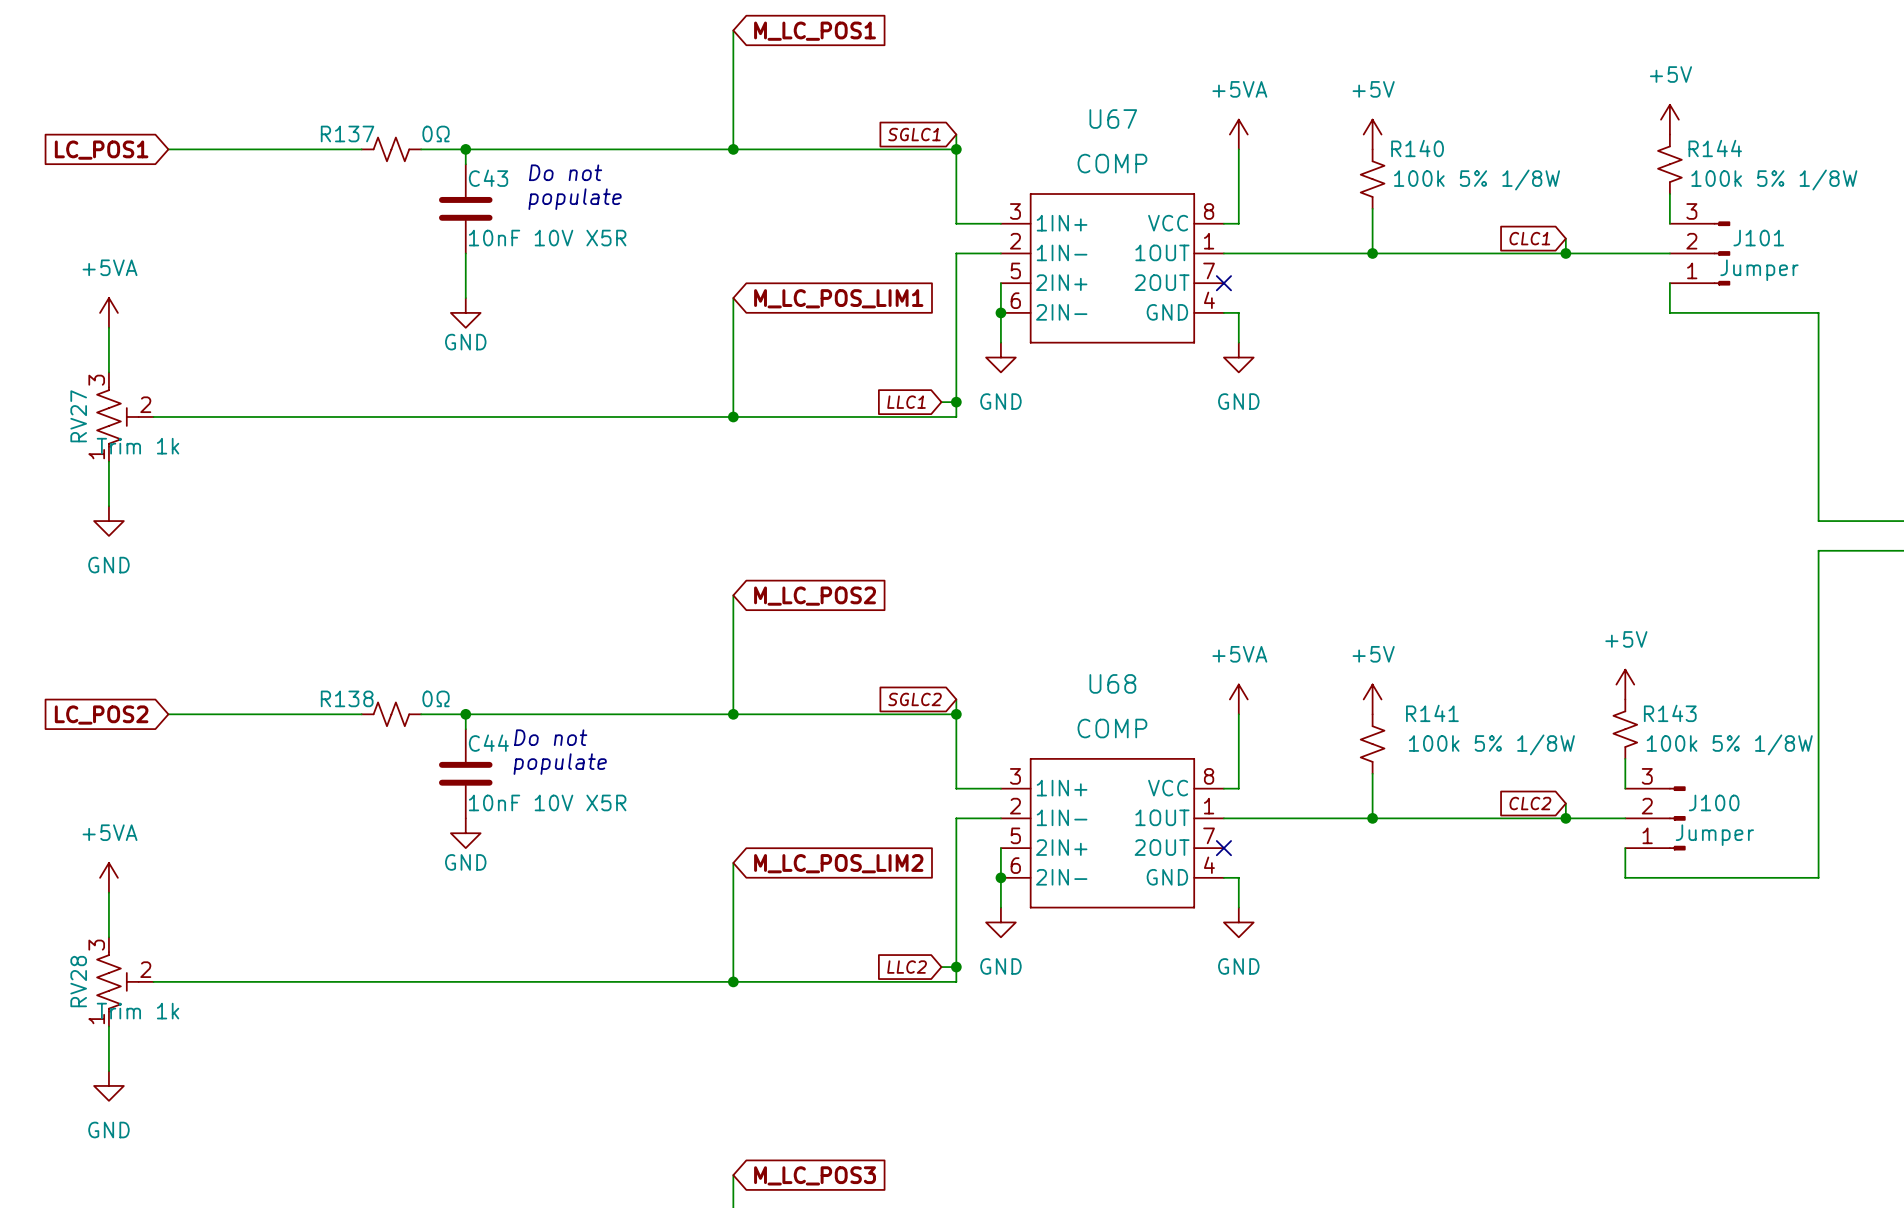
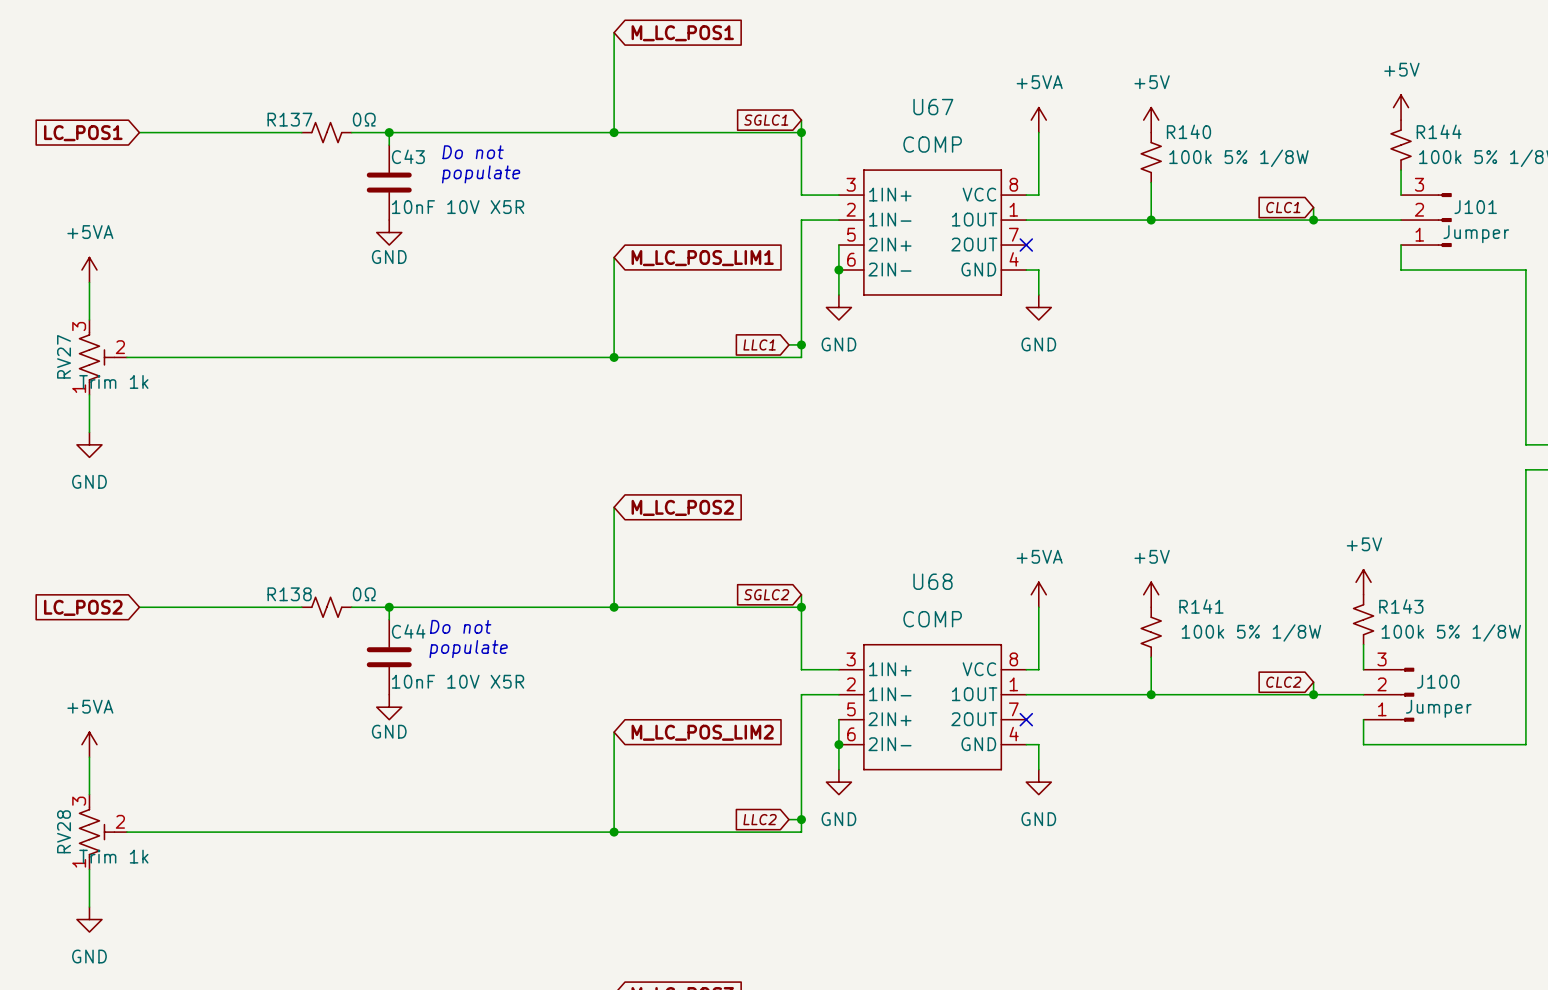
wire: (465, 253) (465, 298) -> none
power symbol position: GND (465, 312) -> GND (389, 232)

